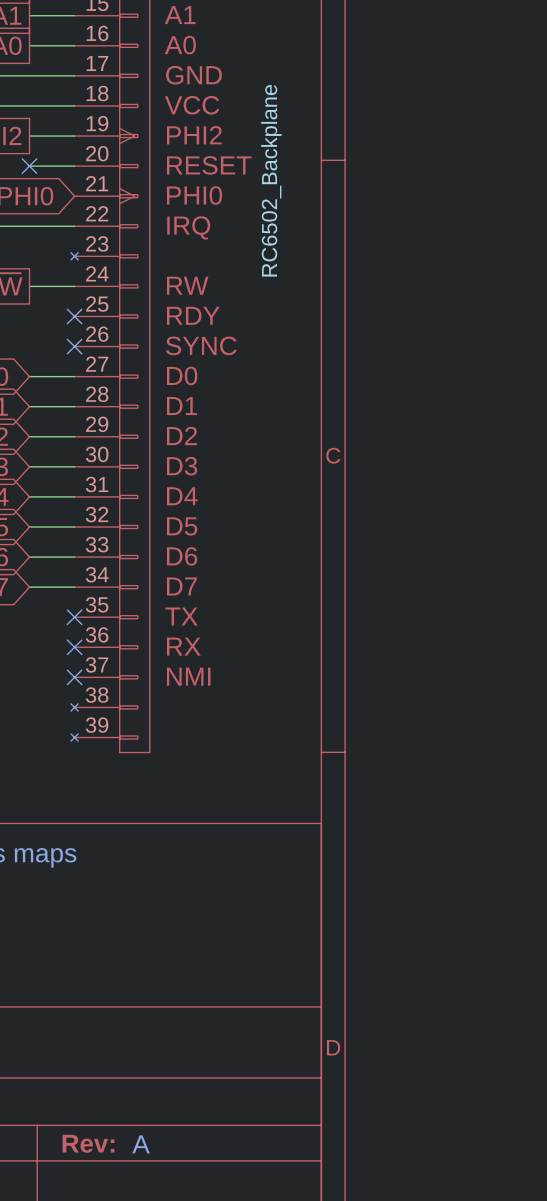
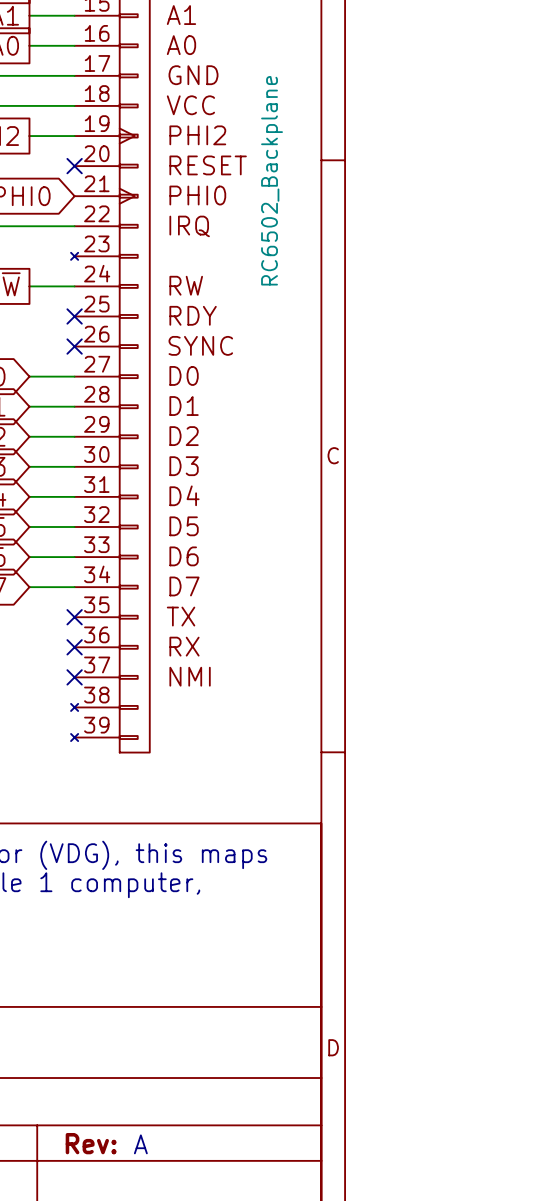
wire: (29, 166) (74, 166) -> none
no-connect mark position: (29, 166) -> (74, 166)

